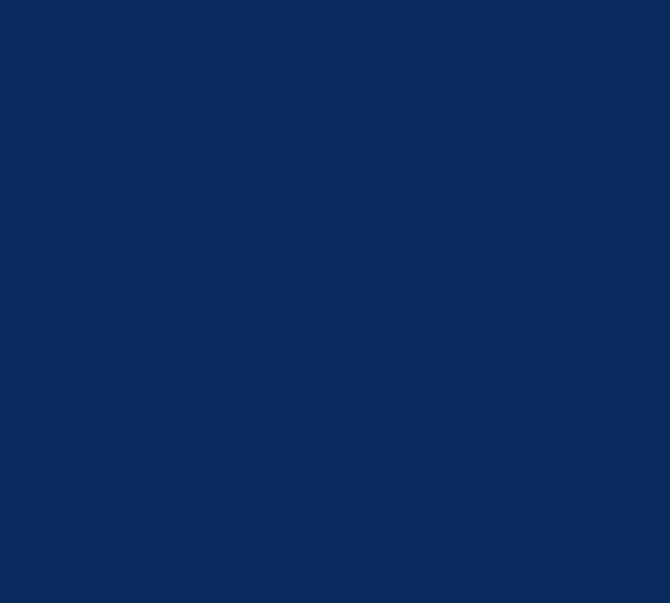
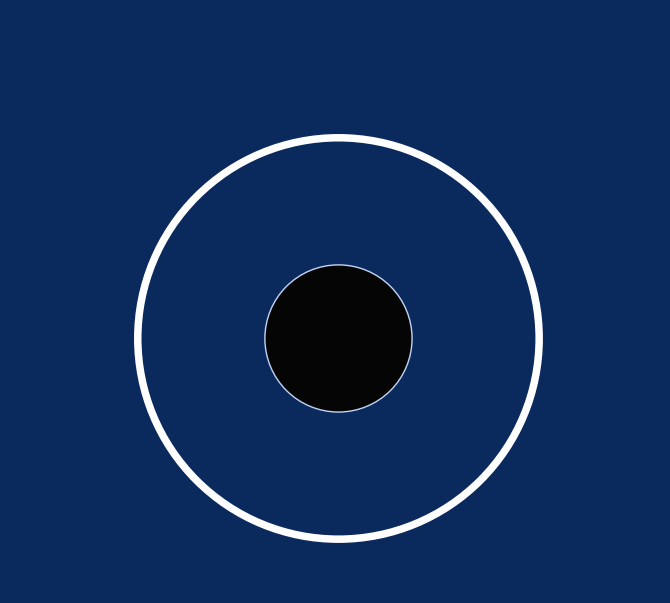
part: none -> (338, 338)

